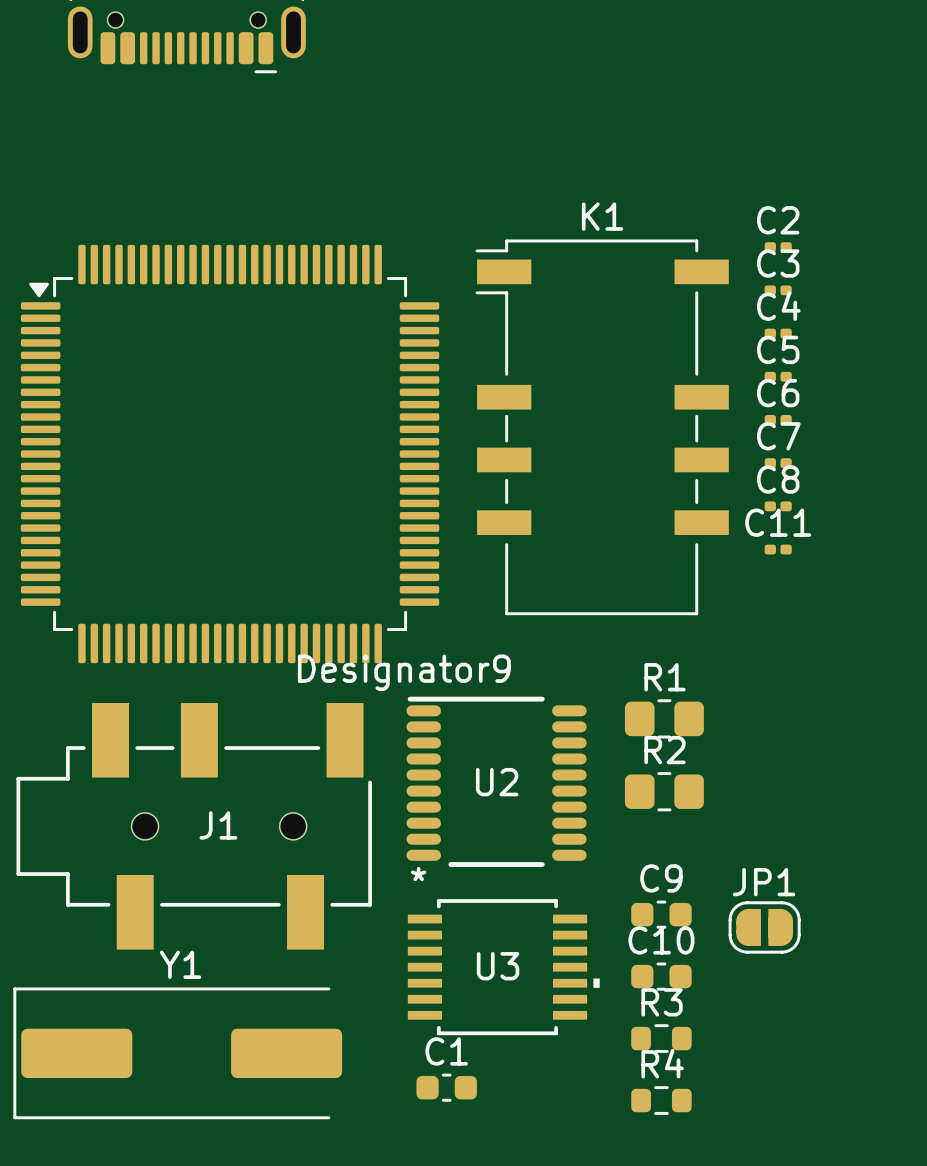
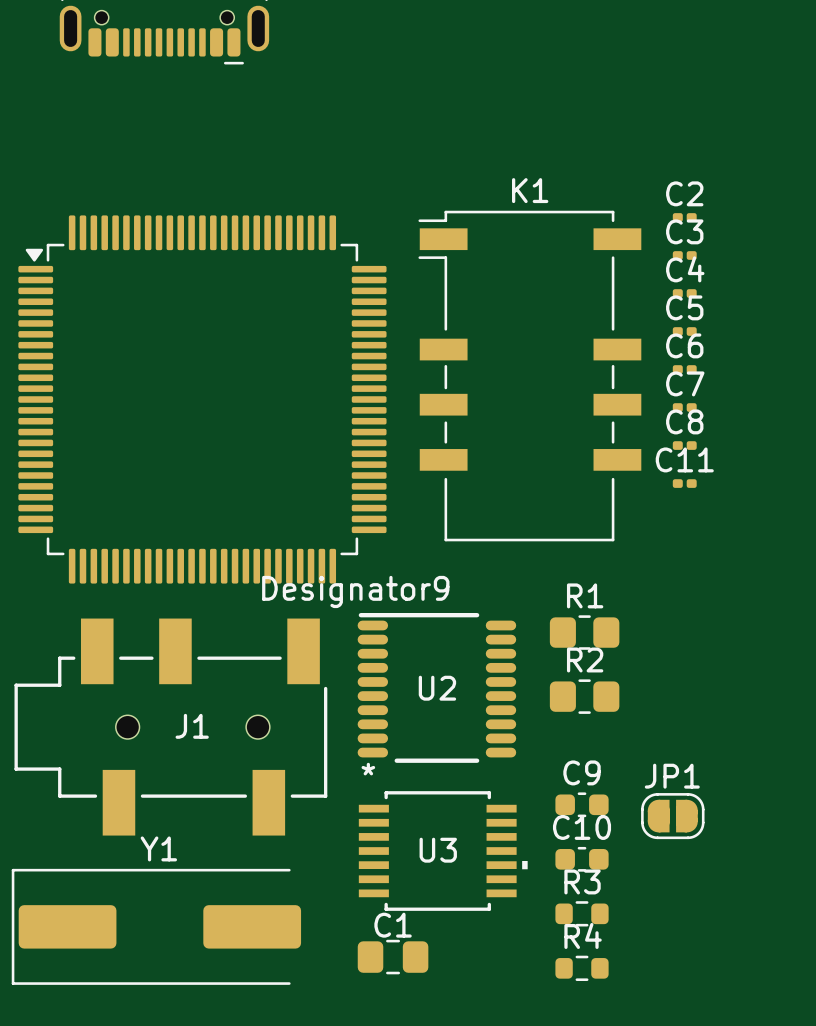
C1 footprint: [416, 1073, 477, 1102] -> [357, 939, 429, 975]

